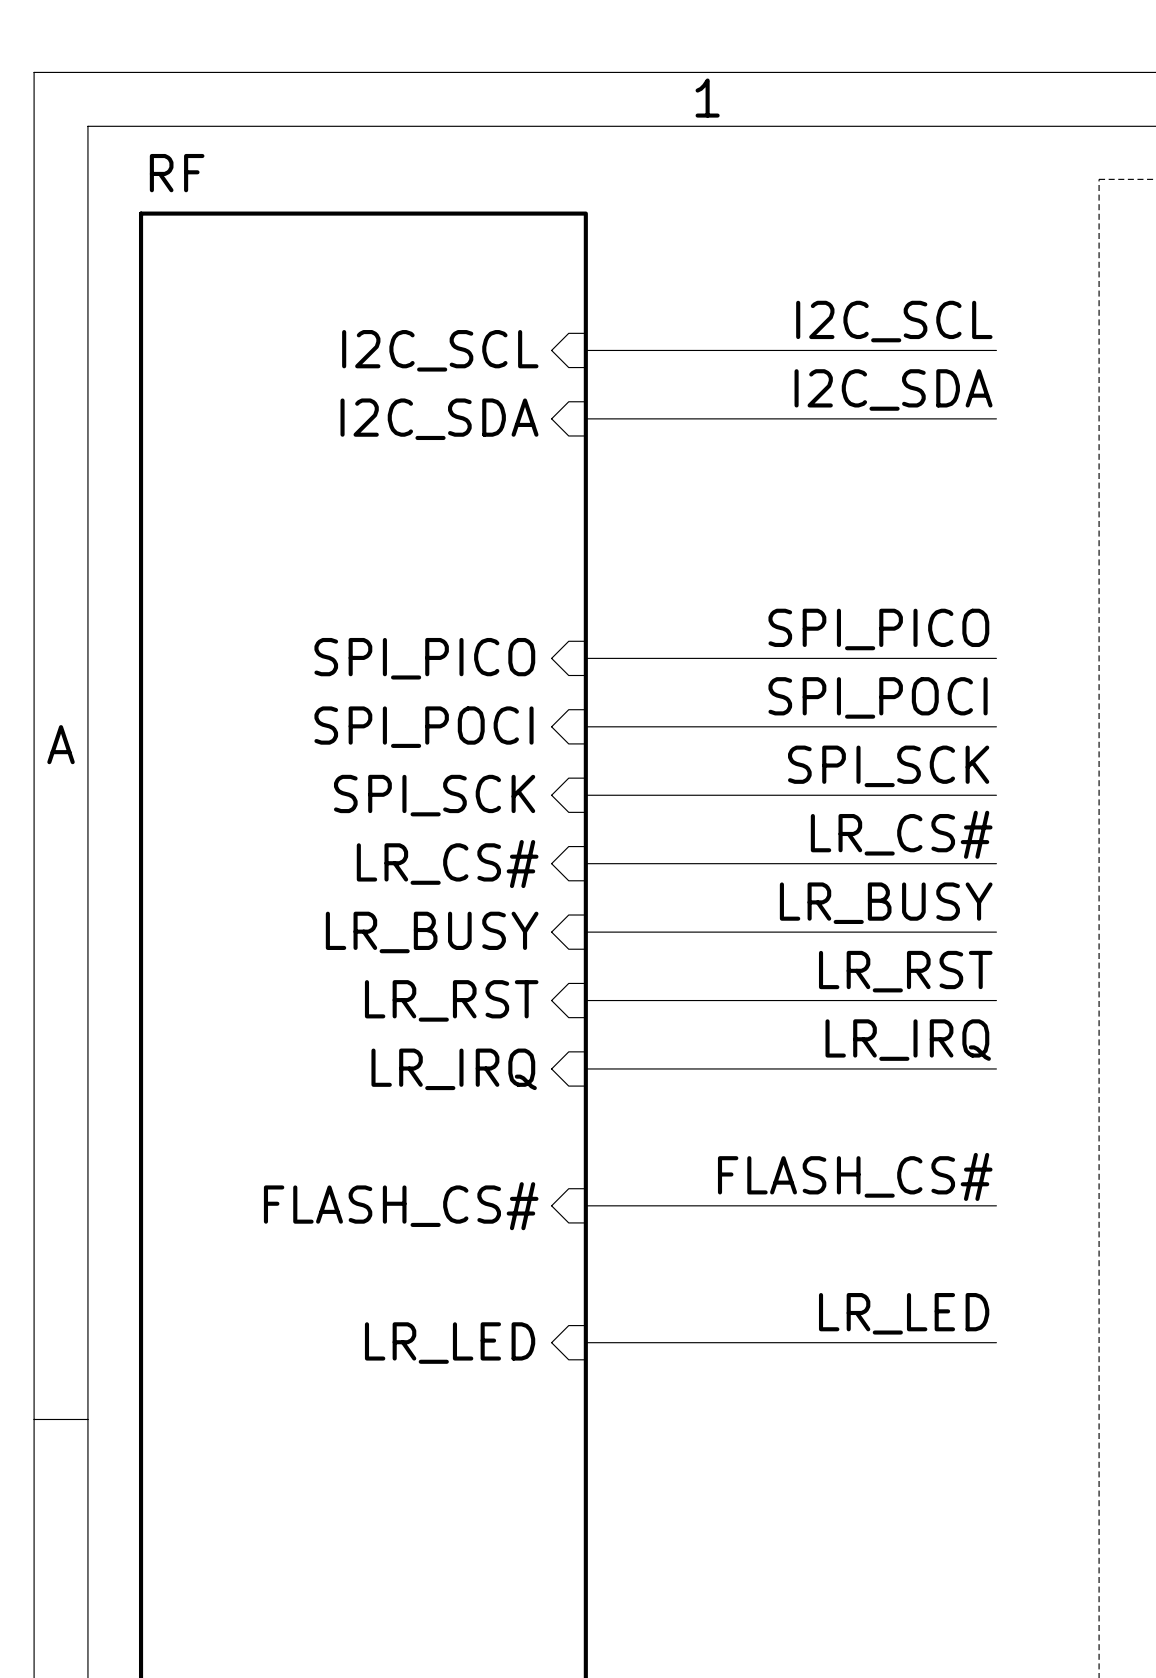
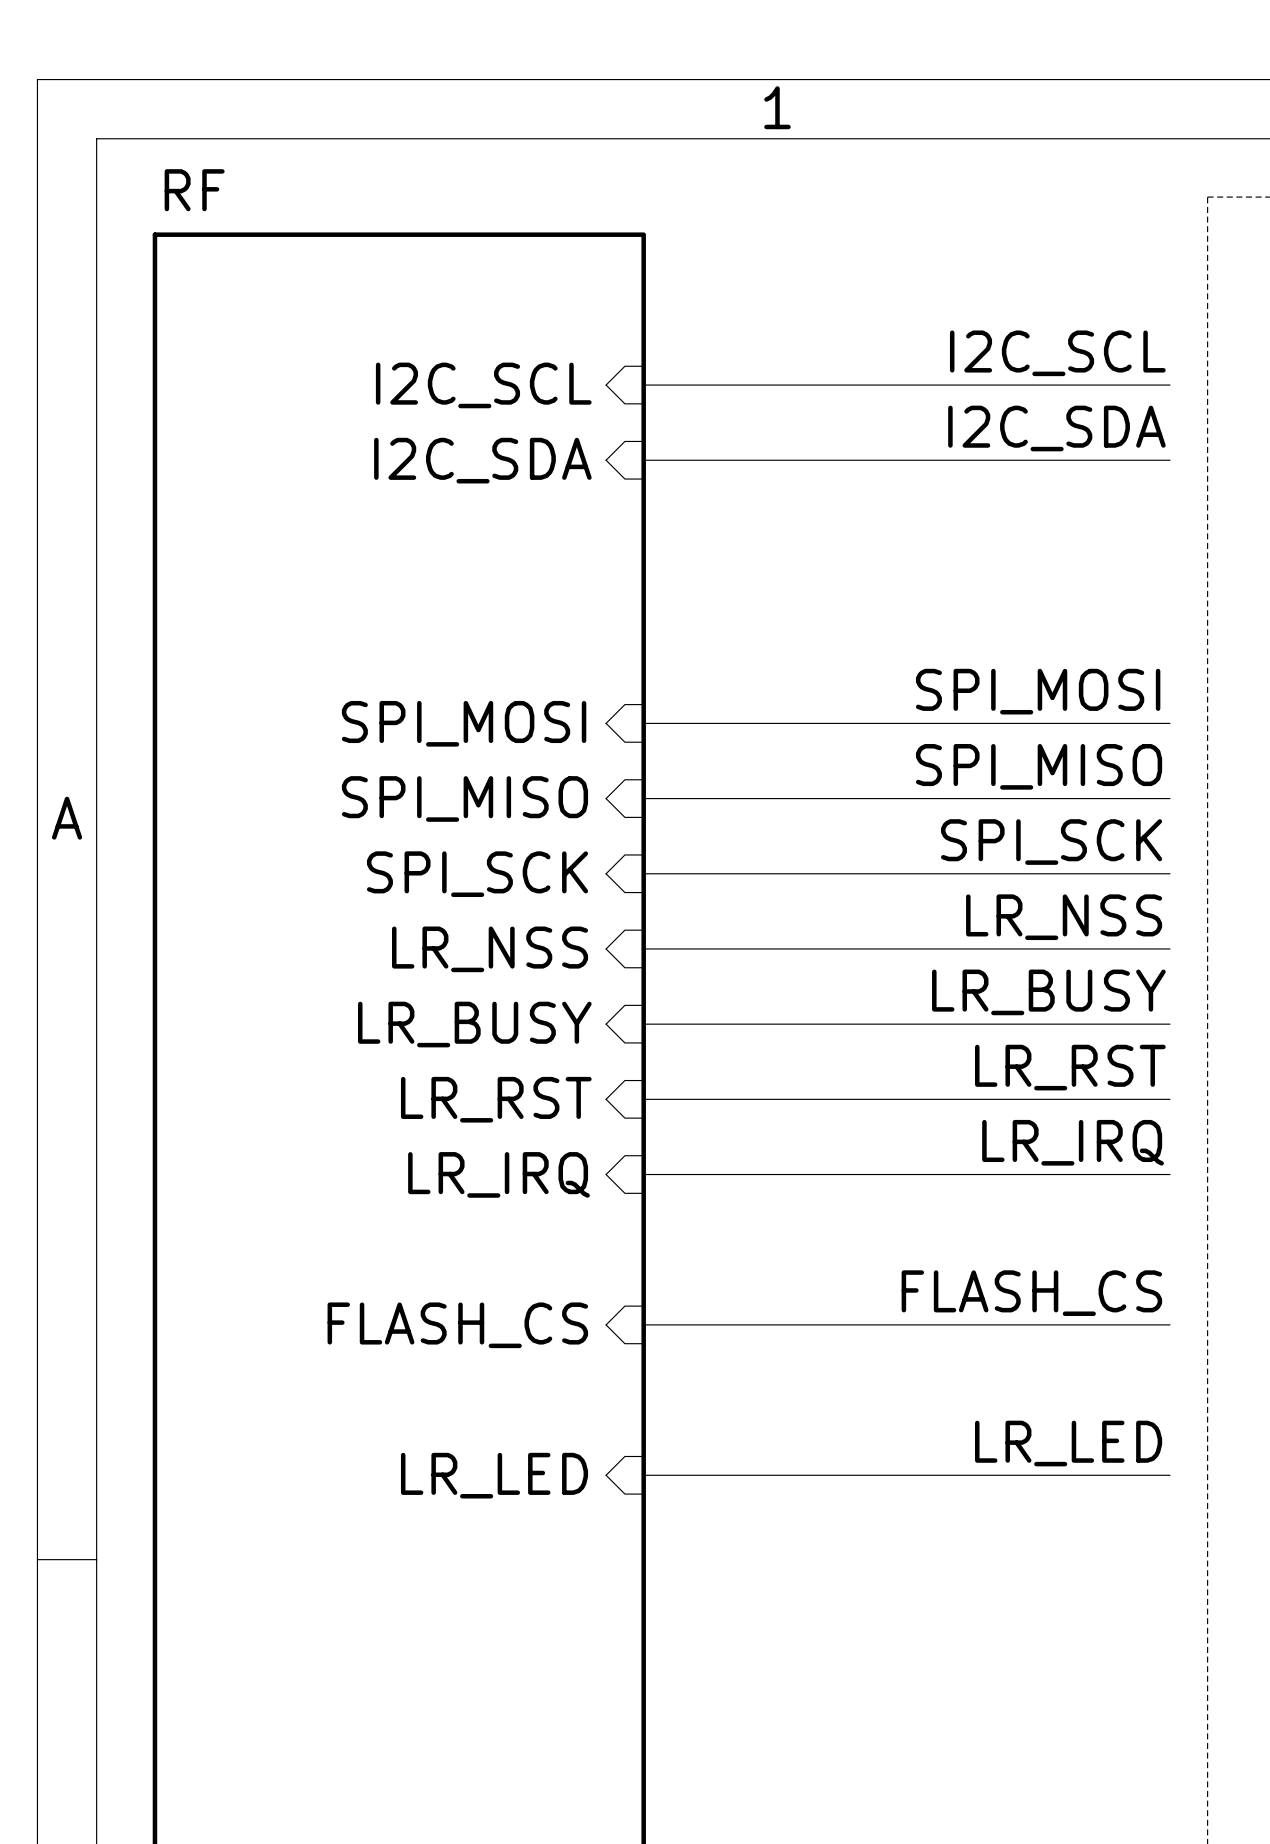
label position: I2C_SCL (894, 321) -> I2C_SCL (1057, 353)
wire: none -> (1094, 385) (1170, 385)
label position: I2C_SDA (893, 389) -> I2C_SDA (1056, 428)
wire: none -> (1094, 460) (1170, 460)
label: SPI_PICO (878, 629) -> none
label: none -> SPI_MOSI (1038, 691)
sheet pin: SPI_PICO (424, 658) -> SPI_MOSI (464, 723)
wire: none -> (1094, 723) (1170, 723)
label: SPI_POCI (878, 697) -> none
label: none -> SPI_MISO (1039, 766)
wire: none -> (1094, 798) (1170, 798)
sheet pin: SPI_POCI (424, 727) -> SPI_MISO (464, 798)
label position: SPI_SCK (888, 766) -> SPI_SCK (1051, 842)
wire: none -> (1094, 873) (1170, 873)
label: LR_CS# (901, 834) -> LR_NSS (1064, 917)
wire: none -> (1094, 948) (1170, 948)
sheet pin: LR_CS# (447, 864) -> LR_NSS (490, 949)
label position: LR_BUSY (886, 903) -> LR_BUSY (1048, 992)
wire: none -> (1094, 1024) (1170, 1024)
label position: LR_RST (905, 971) -> LR_RST (1070, 1067)
wire: none -> (1094, 1099) (1170, 1099)
label position: LR_IRQ (908, 1040) -> LR_IRQ (1073, 1142)
wire: none -> (1094, 1174) (1170, 1174)
label: FLASH_CS# (855, 1176) -> FLASH_CS (1031, 1293)
wire: none -> (1094, 1324) (1170, 1324)
sheet pin: FLASH_CS# (401, 1206) -> FLASH_CS (457, 1325)
label position: LR_LED (904, 1313) -> LR_LED (1068, 1443)
wire: none -> (1094, 1475) (1170, 1475)

